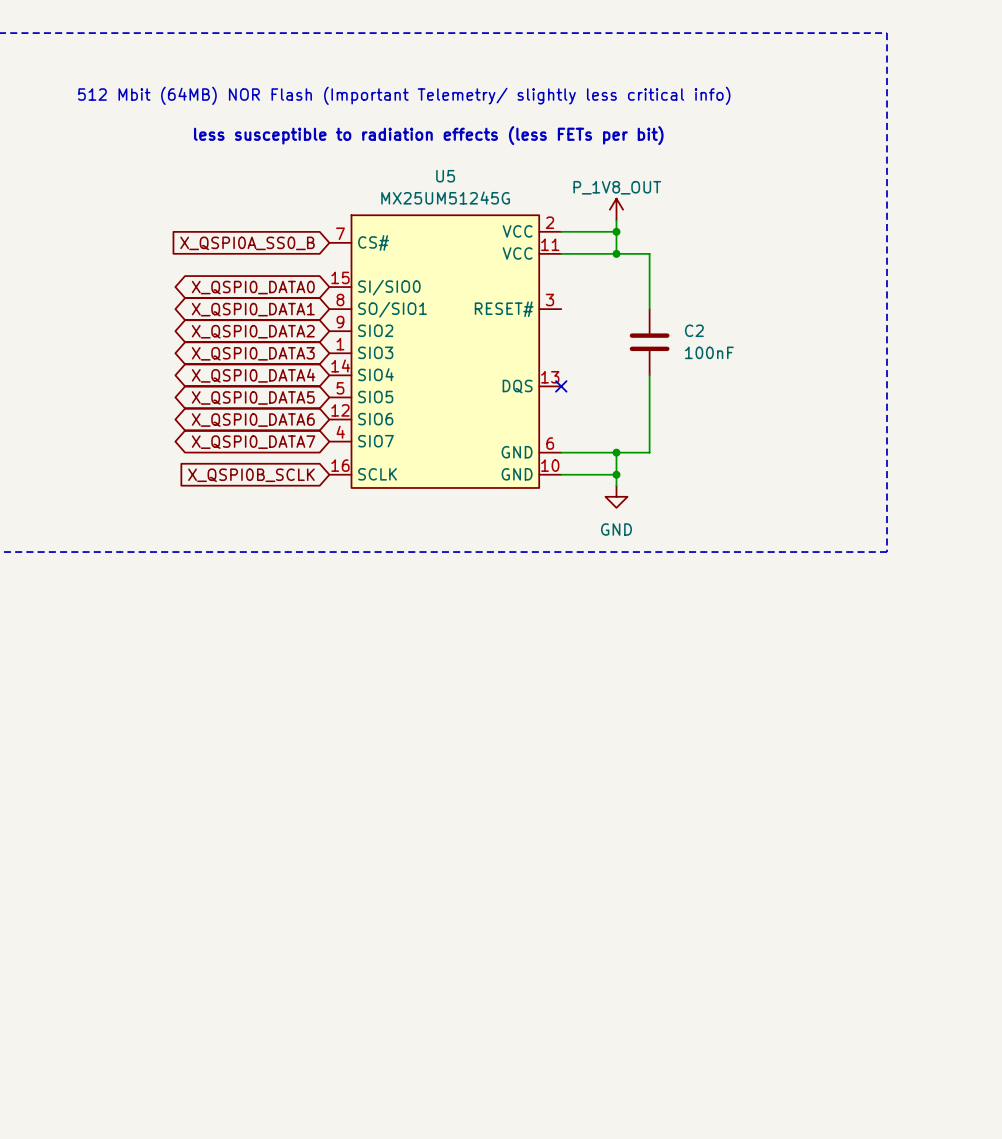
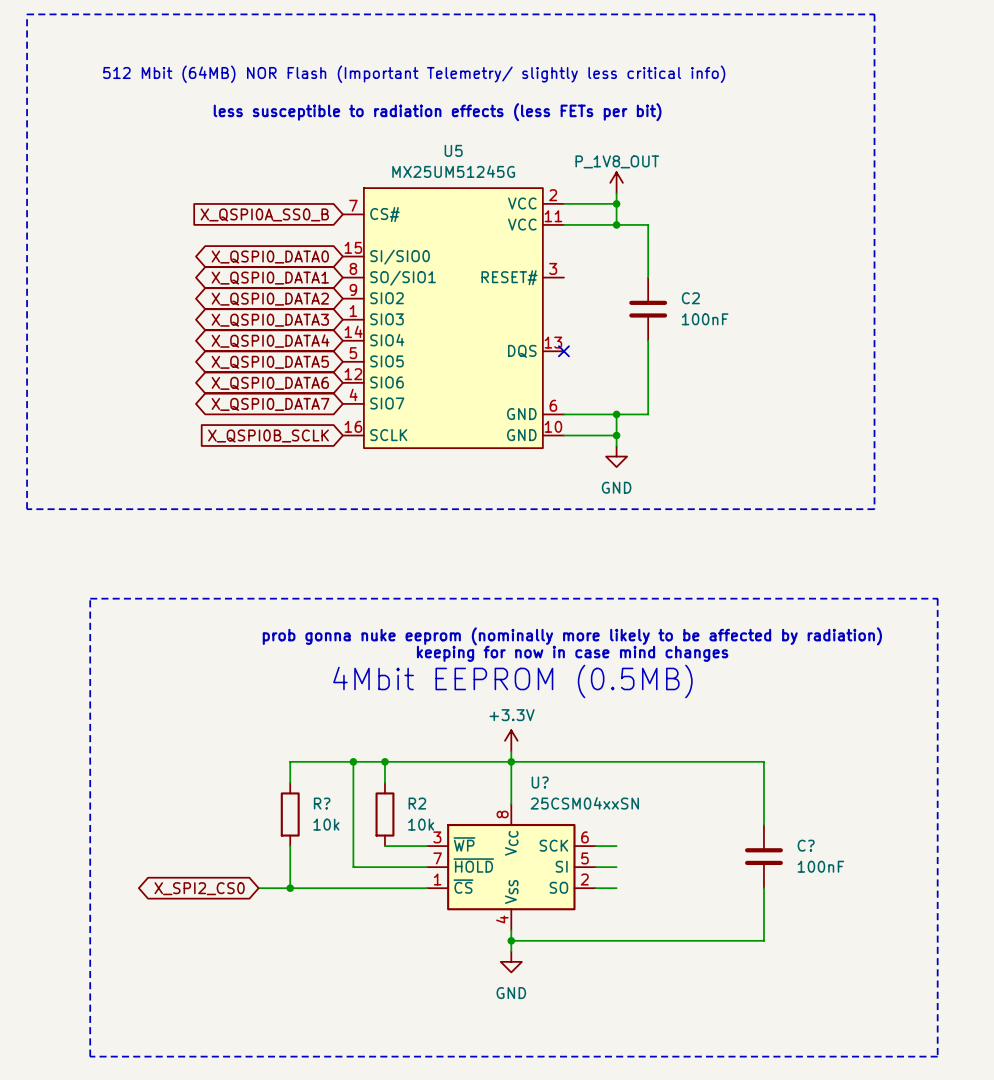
line: none -> (90, 598) (937, 598) (937, 1056) (90, 1056) (90, 598)
text: none -> prob gonna nuke eeprom (nominally more likely to be affected by radiation) (572, 636)
text: none -> keeping for now in case mind changes (572, 653)
text: none -> 4Mbit EEPROM (0.5MB) (512, 681)
power symbol: none -> +3.3V (511, 740)
wire: none -> (511, 751) (511, 803)
wire: none -> (353, 761) (353, 867) (427, 867)
junction: none -> (353, 761)
wire: none -> (384, 761) (384, 782)
junction: none -> (384, 761)
junction: none -> (511, 761)
wire: none -> (290, 782) (290, 761) (763, 761) (763, 825)
R?: none -> 10k (290, 814)
R2: none -> 10k (384, 814)
wire: none -> (290, 846) (290, 888)
wire: none -> (384, 846) (427, 846)
wire: none -> (595, 846) (616, 846)
C?: none -> 100nF (763, 856)
U?: none -> 25CSM04xxSN (511, 867)
wire: none -> (595, 867) (616, 867)
wire: none -> (258, 888) (427, 888)
junction: none -> (290, 888)
wire: none -> (595, 888) (616, 888)
wire: none -> (763, 888) (763, 940) (511, 940)
global label: none -> X_SPI2_CS0 (199, 888)
wire: none -> (511, 930) (511, 951)
junction: none -> (511, 940)
power symbol: none -> GND (511, 961)

